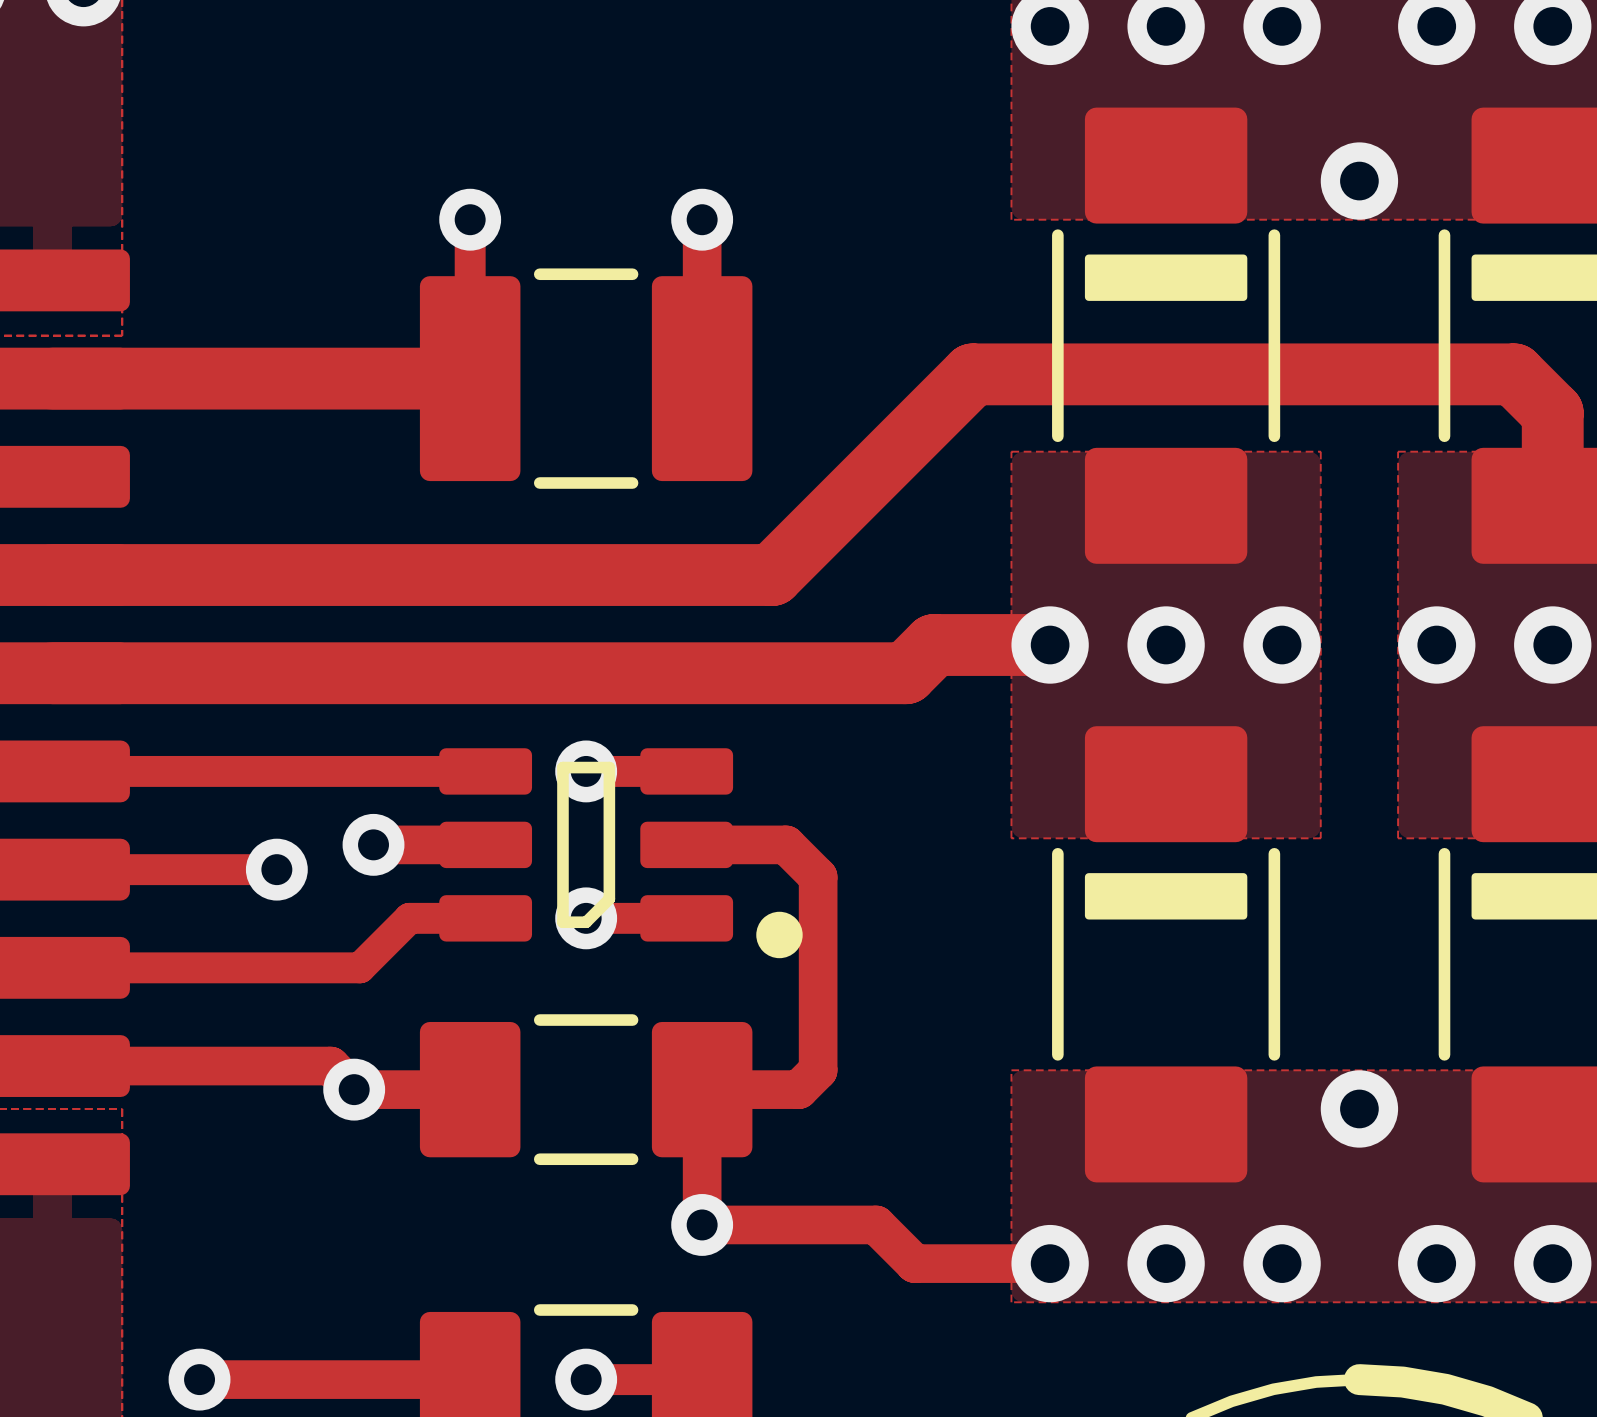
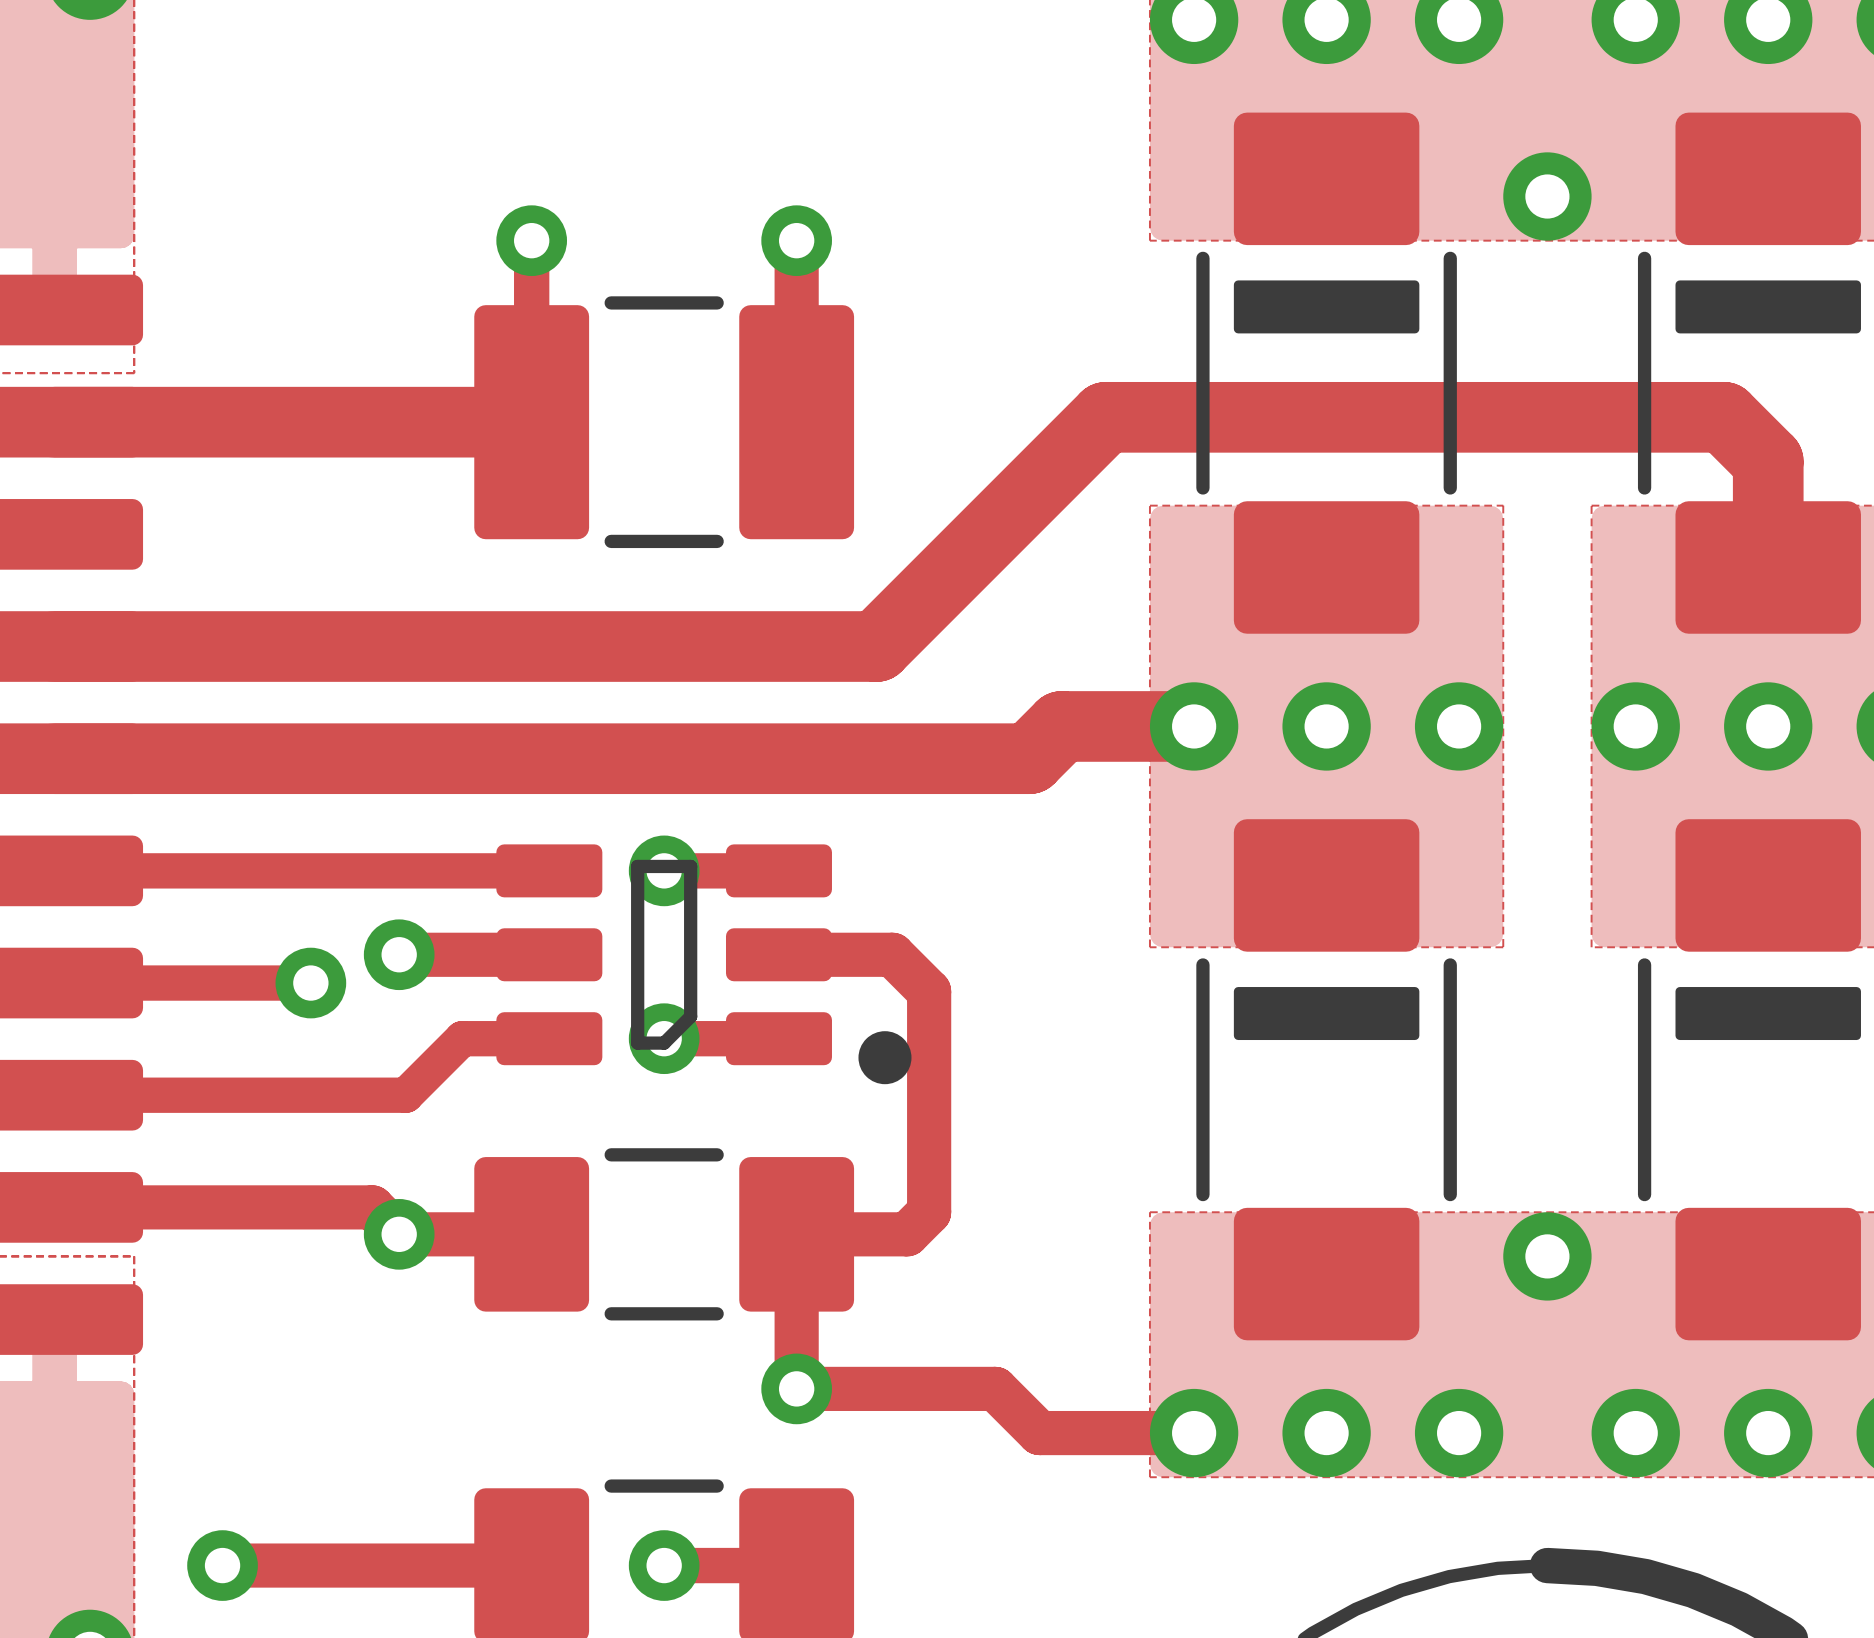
via position: (373, 844) -> (399, 954)

